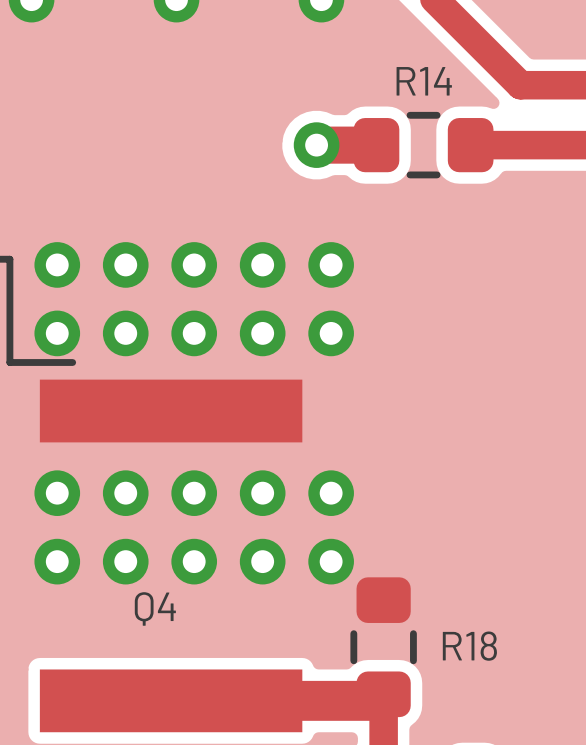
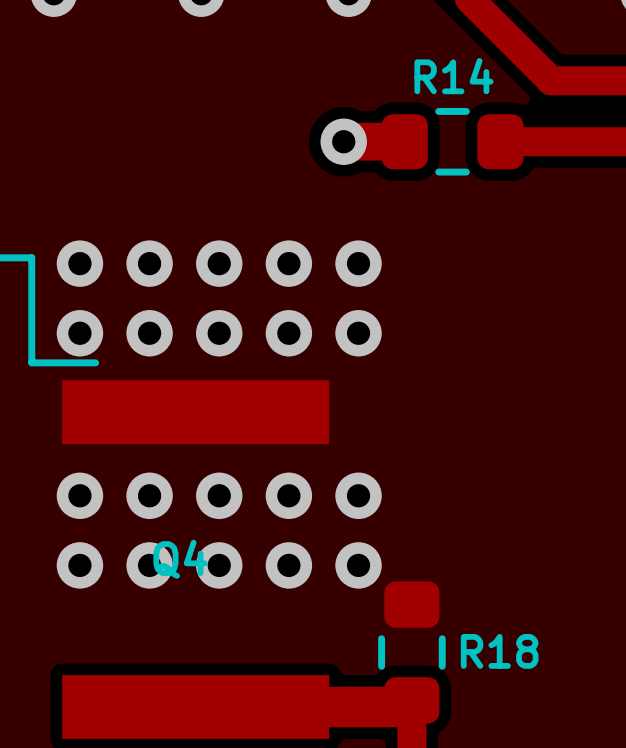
Q4 name position: Q4 (155, 608) -> Q4 (180, 559)

